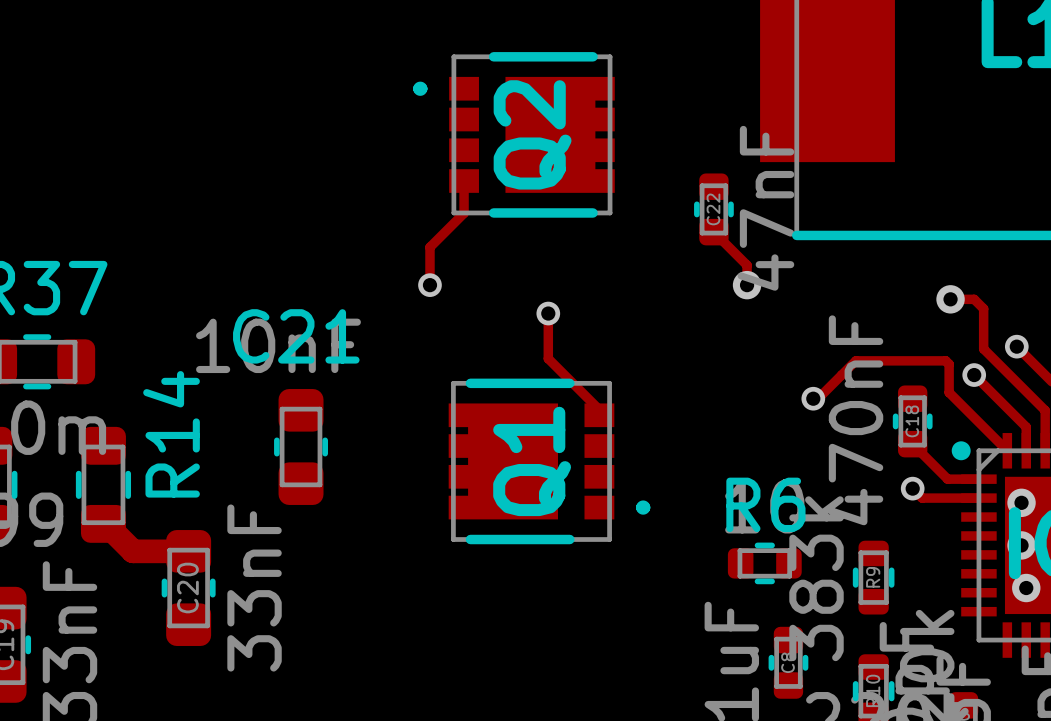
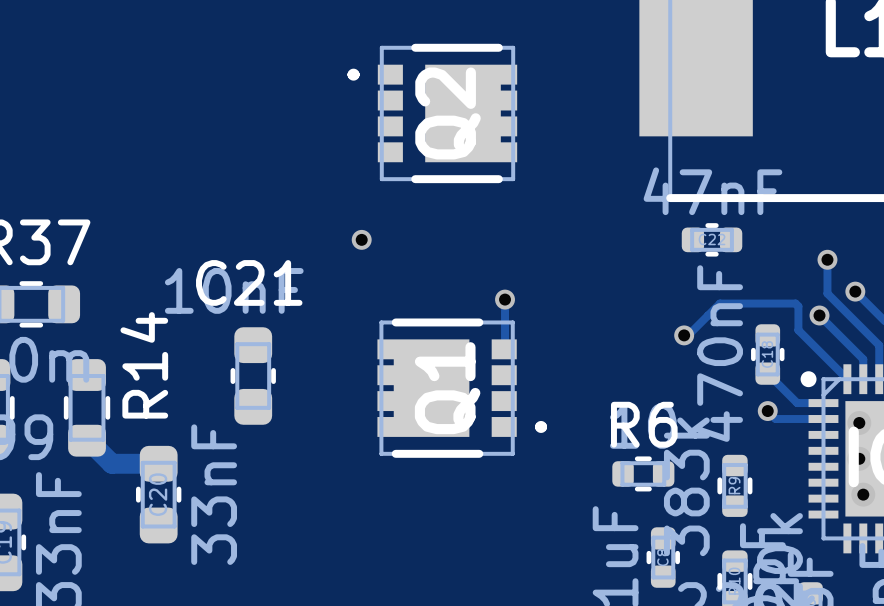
track: (464, 181) (464, 213) (429, 247) (429, 285) -> none
C22 rotation: 0° (713, 209) -> 90° clockwise (712, 239)
C22 position: (713, 209) -> (712, 239)
track: (713, 232) (747, 265) (747, 285) -> none
via: (747, 285) -> none
track: (950, 299) (974, 299) (983, 308) -> none
via: (950, 299) -> none
via: none -> (827, 259)
track: (548, 313) (548, 358) (599, 409) -> (505, 299) (504, 344)
via position: (548, 313) -> (505, 299)

